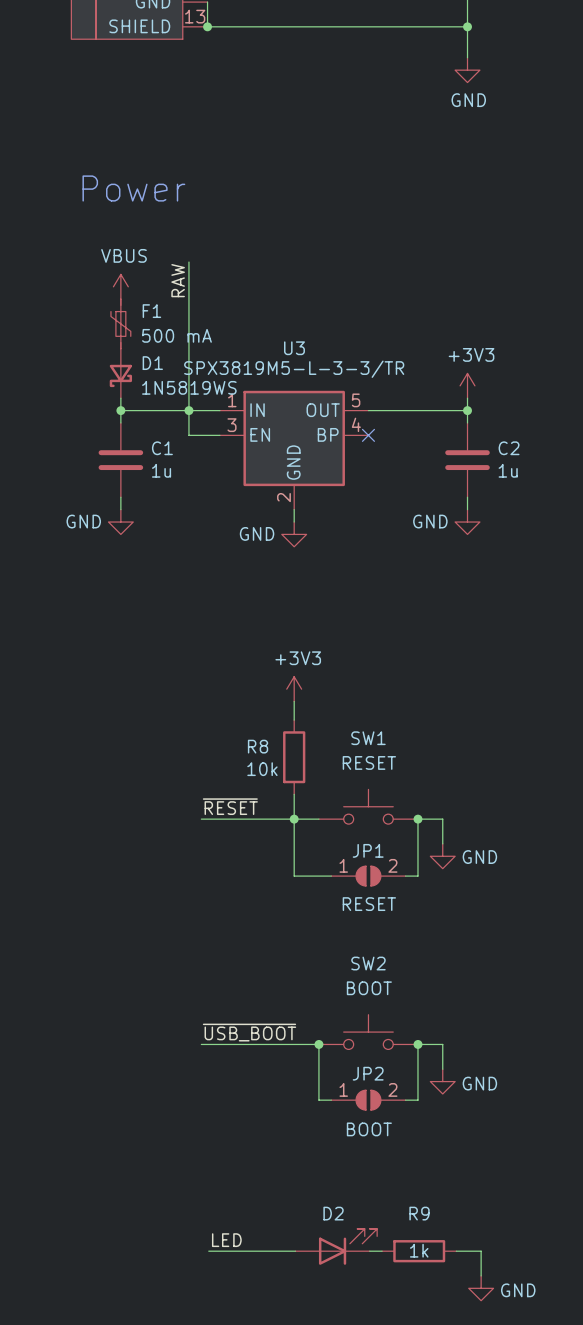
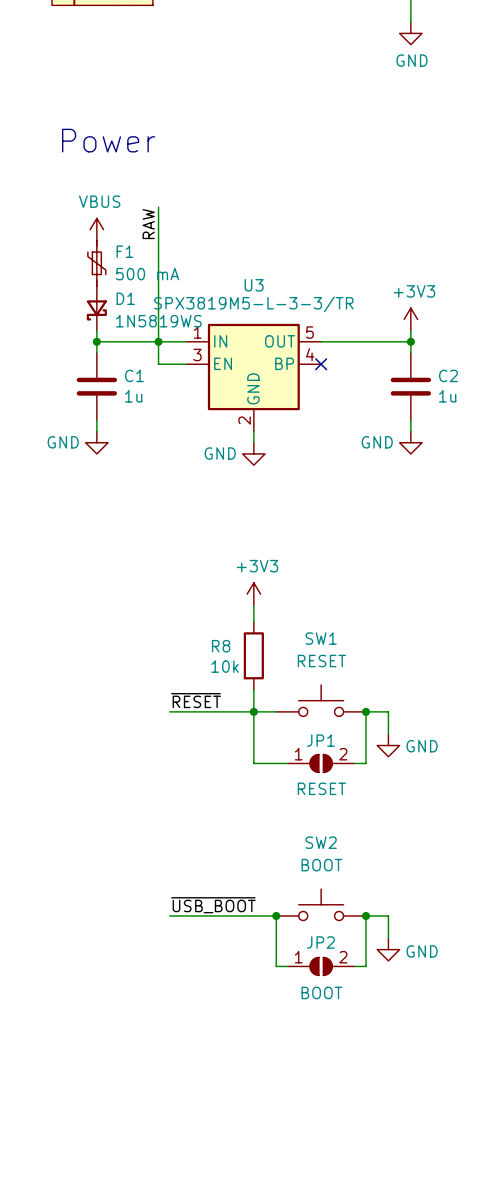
label: LED (226, 1240) -> none
D2: (336, 1246) -> none
wire: (208, 1251) (295, 1251) -> none
wire: (369, 1251) (382, 1251) -> none
R9: 1k (419, 1251) -> none
wire: (456, 1251) (481, 1251) (481, 1275) -> none
power symbol: GND (481, 1288) -> none

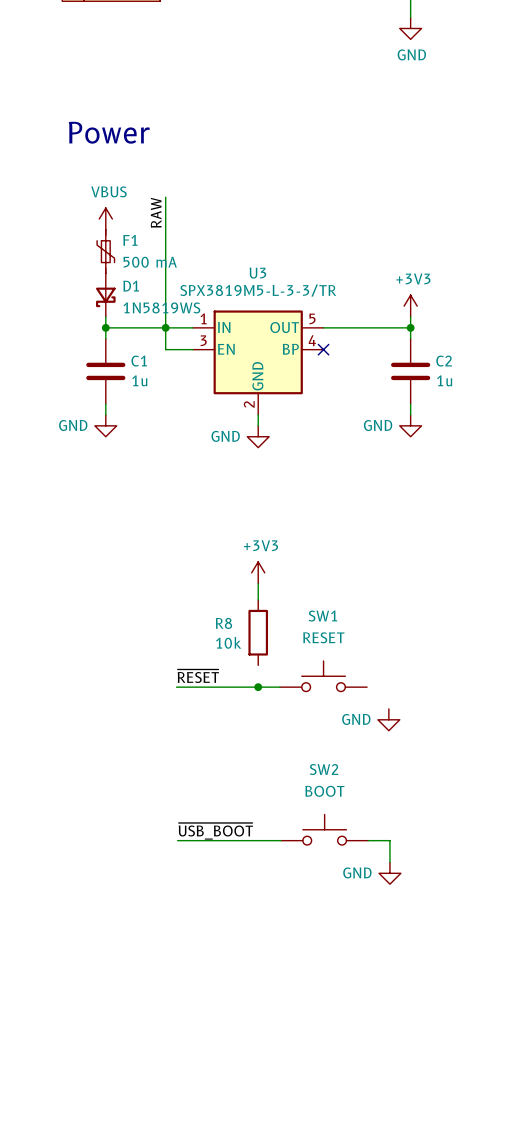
wire: (253, 689) (253, 763) (287, 763) -> none
junction: (366, 711) -> none
wire: (388, 734) (388, 711) (366, 711) (366, 763) (354, 763) -> none
power symbol text position: GND (422, 746) -> GND (356, 719)
JP1: RESET (321, 763) -> none
wire: none -> (177, 840) (281, 840)
wire: none -> (368, 840) (389, 840) (389, 862)
SW2 position: (321, 904) -> (324, 829)
label position: ~{USB_BOOT} (213, 905) -> ~{USB_BOOT} (215, 831)
wire: (169, 915) (276, 915) (276, 966) (287, 966) -> none
junction: (276, 915) -> none
junction: (366, 915) -> none
wire: (388, 938) (388, 915) (366, 915) (366, 966) (354, 966) -> none
power symbol position: GND (388, 949) -> GND (389, 873)
power symbol text position: GND (422, 951) -> GND (357, 872)
JP2: BOOT (321, 966) -> none

